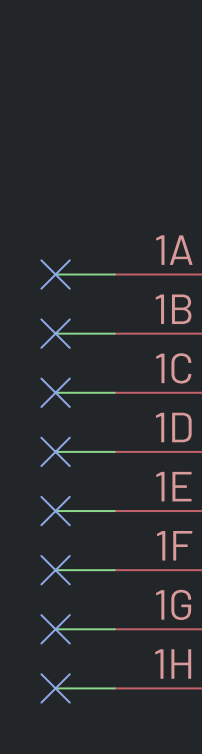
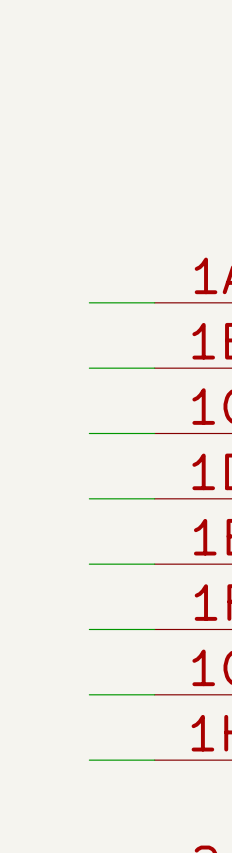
no-connect mark: (55, 274) -> none
no-connect mark: (55, 333) -> none
no-connect mark: (55, 392) -> none
no-connect mark: (55, 451) -> none
no-connect mark: (55, 511) -> none
no-connect mark: (55, 570) -> none
no-connect mark: (55, 629) -> none
no-connect mark: (55, 688) -> none

